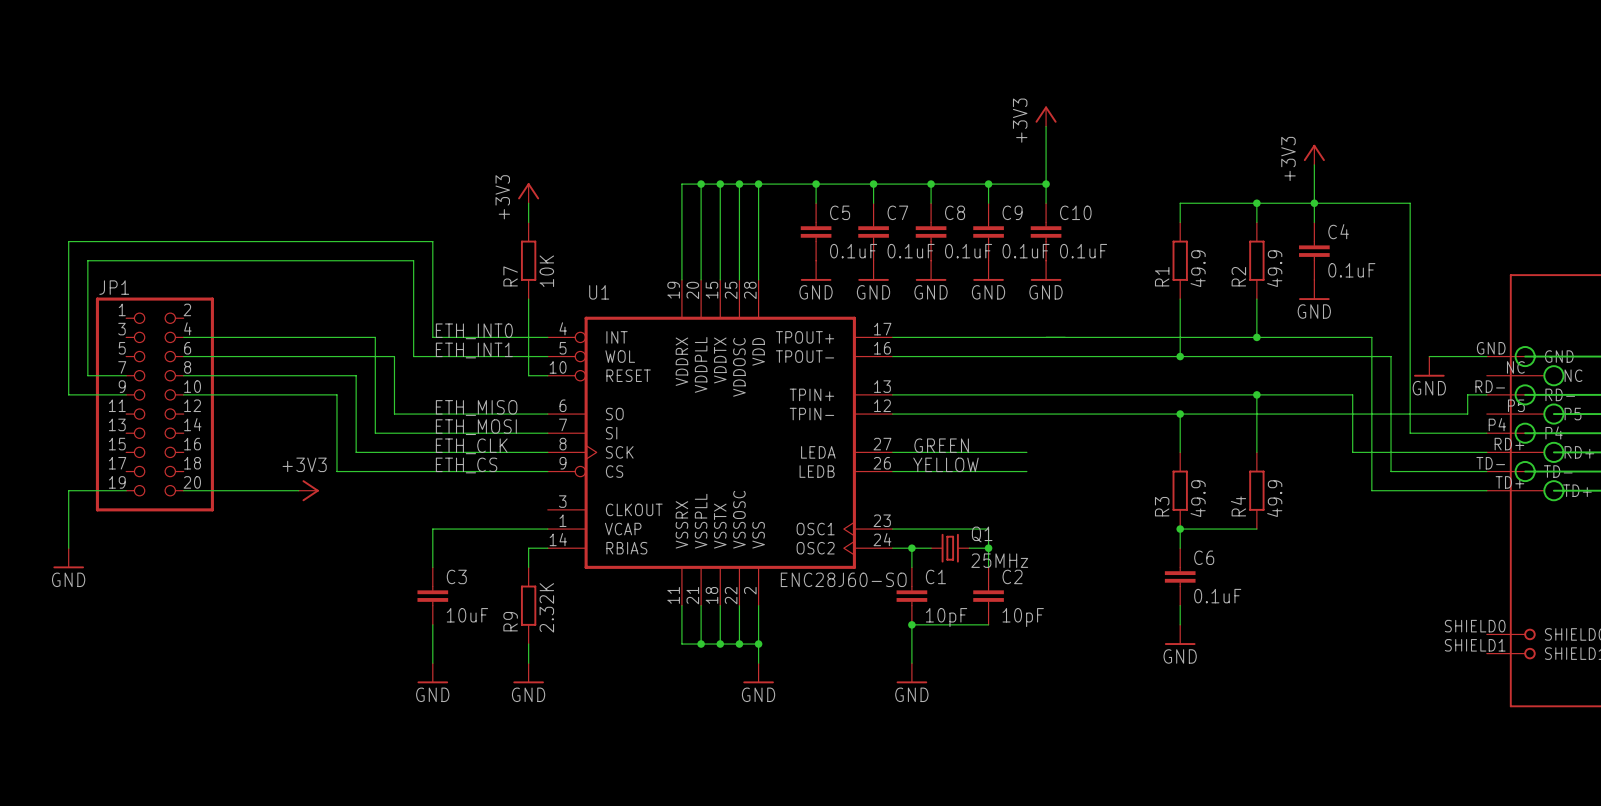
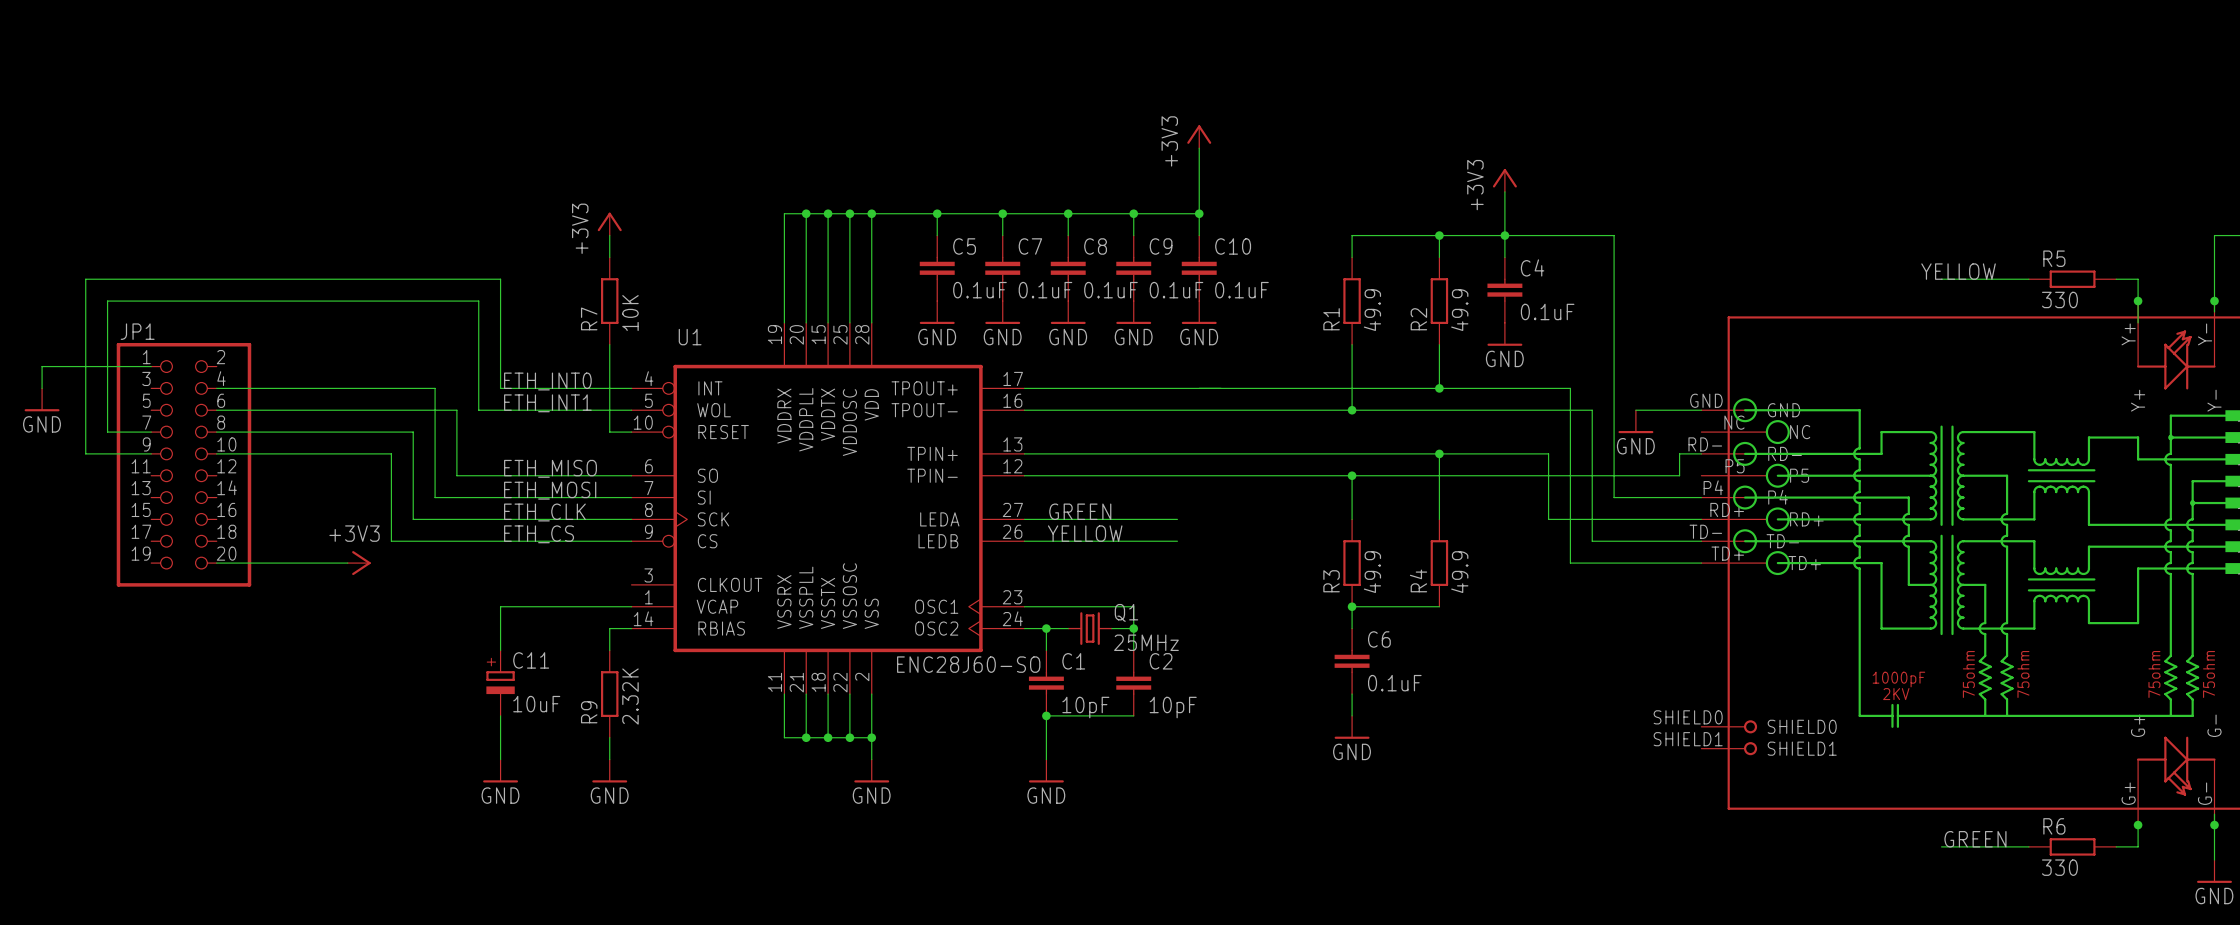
wire: none -> (151, 366) (42, 366) (42, 388)
power symbol: none -> GND (42, 399)
wire: (126, 490) (68, 490) (68, 548) -> none
power symbol: GND (68, 558) -> none
C3: 10uF (432, 596) -> none
C11: none -> 10uF (500, 683)

